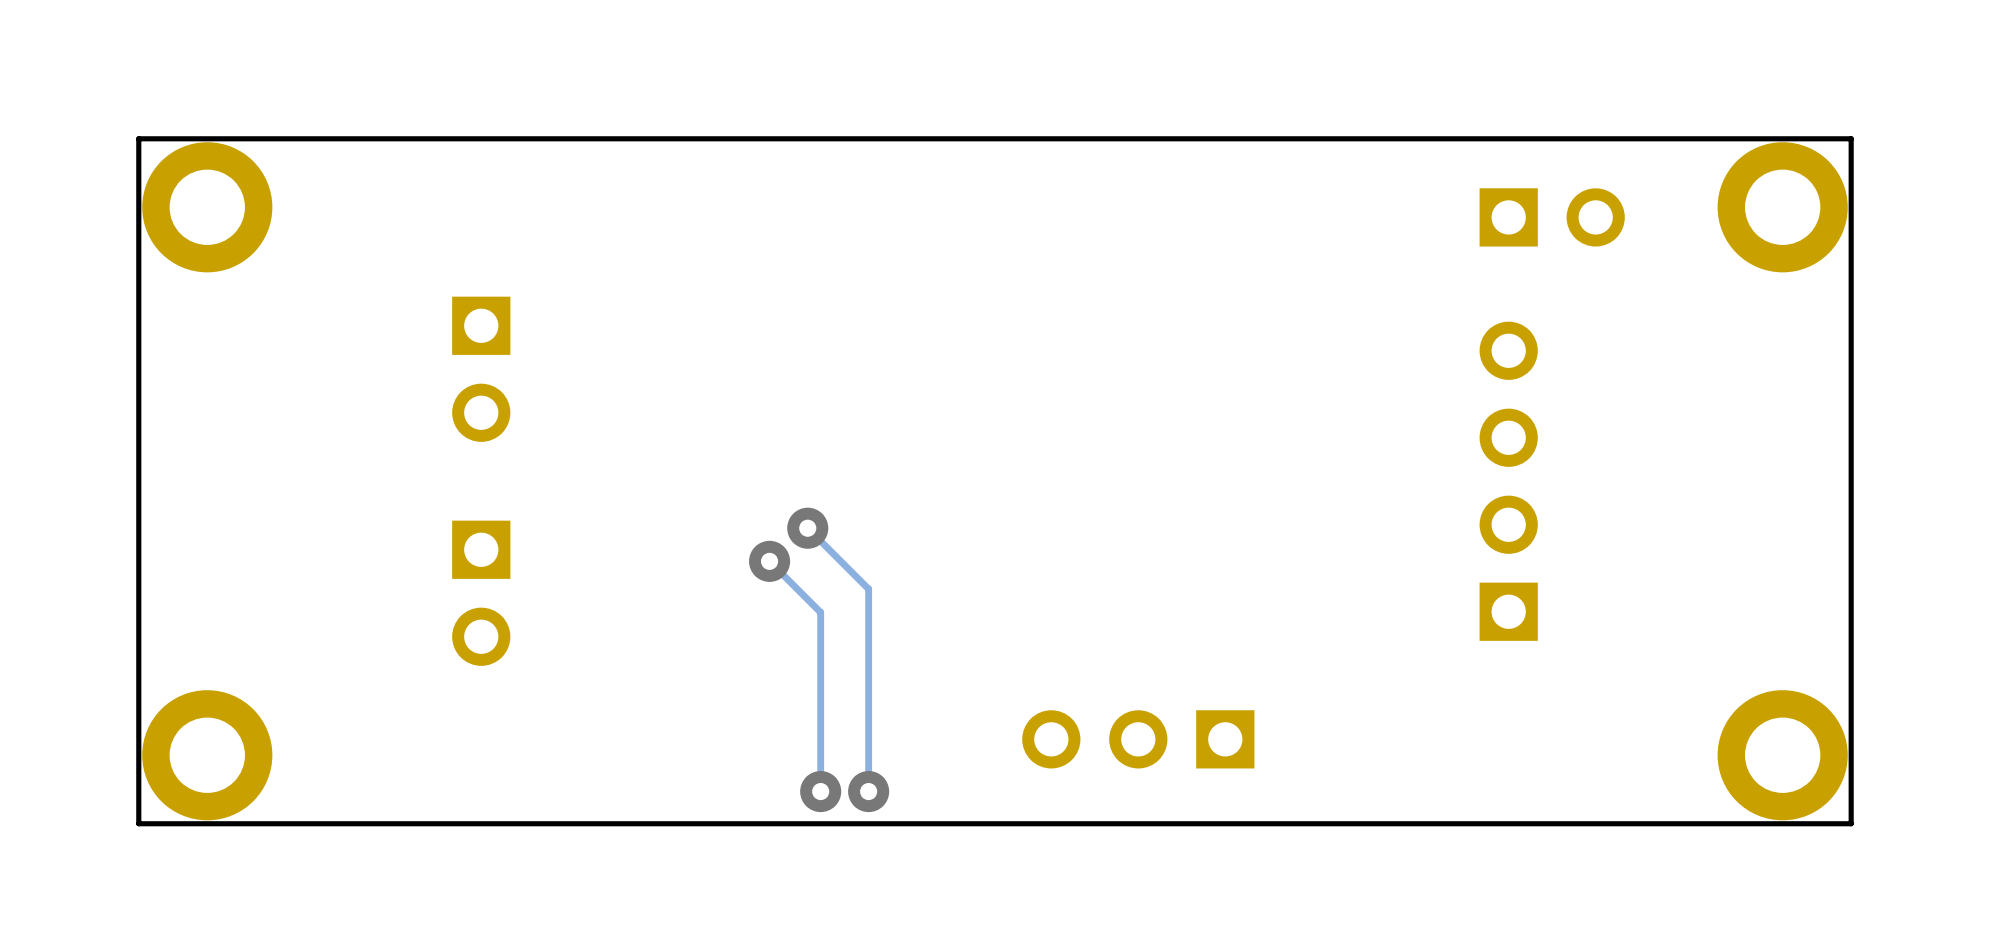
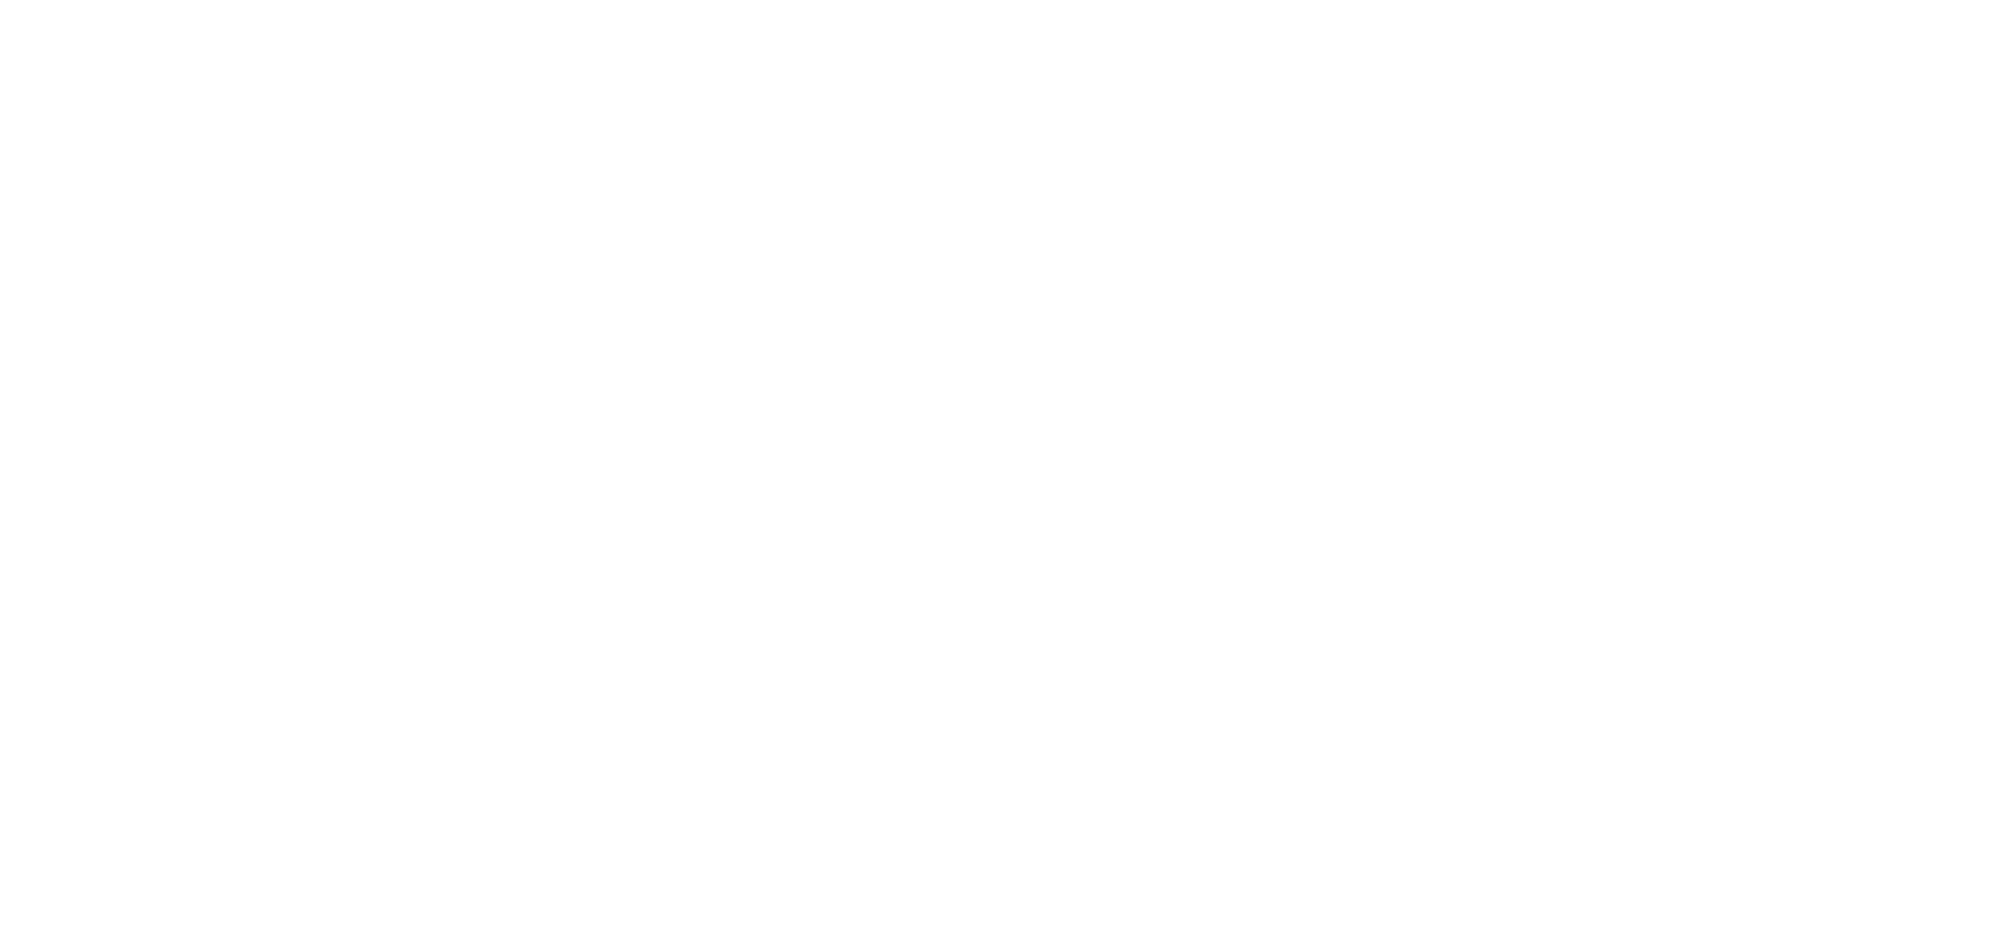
board edge: (1851, 138) (138, 138) (138, 823) (1851, 823) (1851, 138) -> none
part: (207, 207) -> none
part: (1782, 207) -> none
part: (1552, 217) -> none
part: (481, 369) -> none
part: (1508, 481) -> none
track: (807, 528) (868, 589) (868, 791) -> none
via: (807, 528) -> none
track: (769, 561) (820, 612) (820, 791) -> none
via: (769, 561) -> none
part: (481, 593) -> none
part: (1138, 739) -> none
part: (207, 755) -> none
part: (1782, 755) -> none
via: (820, 791) -> none
via: (868, 791) -> none

